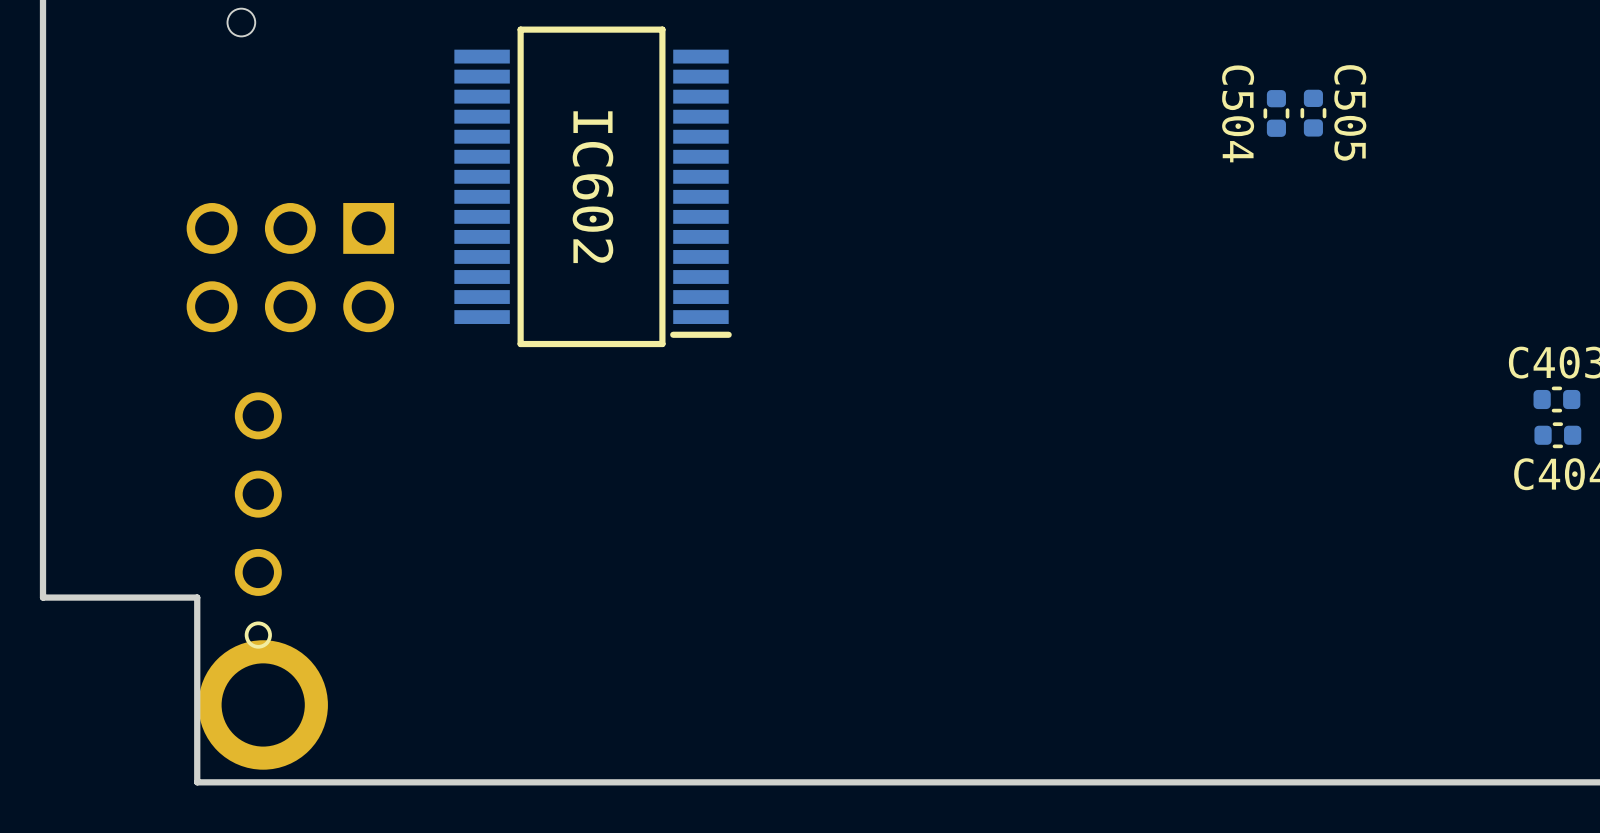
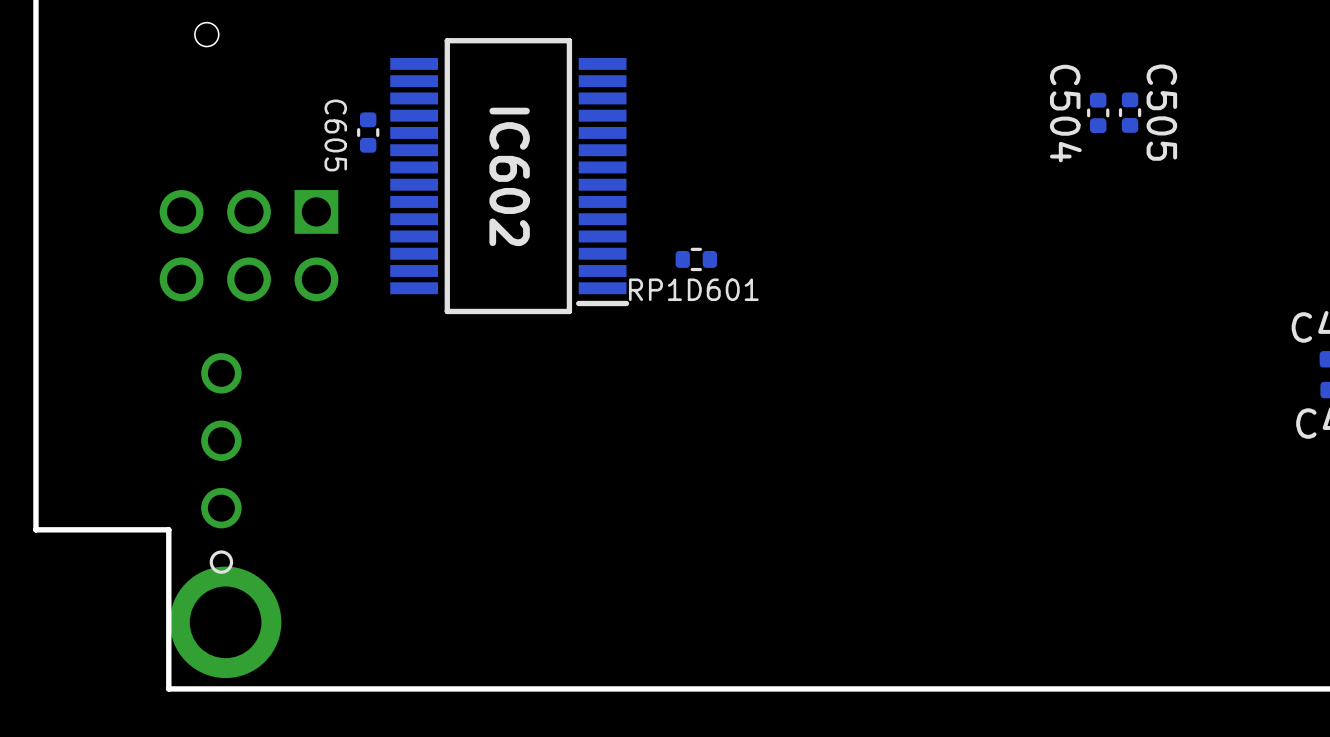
C605: none -> (368, 132)
RP1D601: none -> (696, 259)

